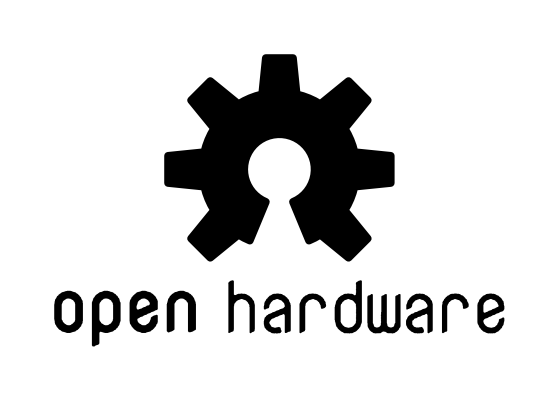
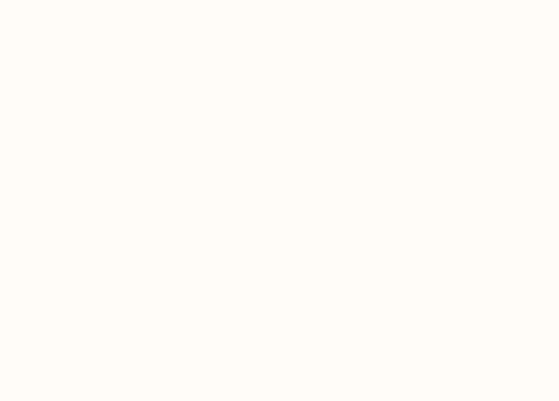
part: (279, 200) -> none

